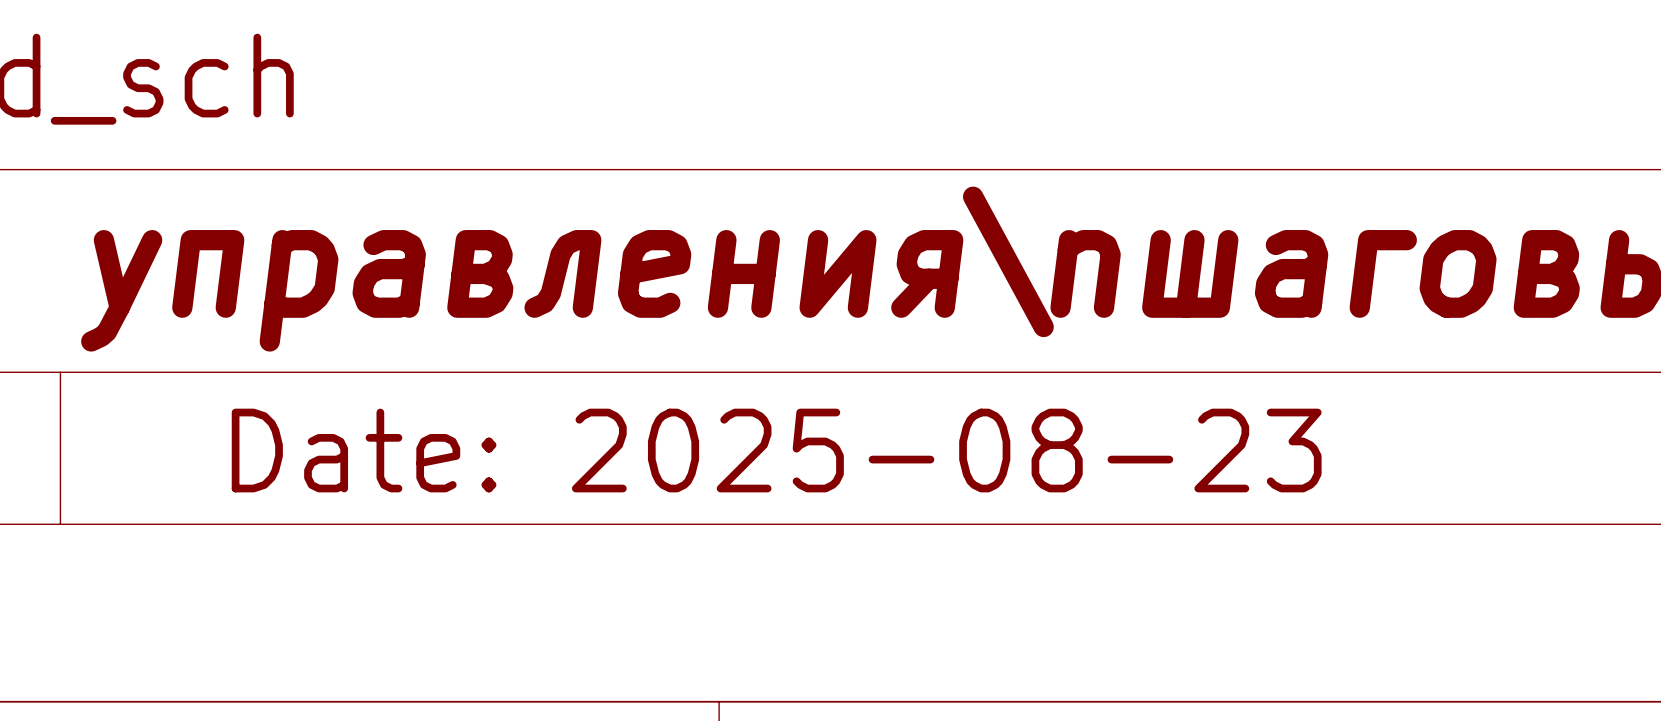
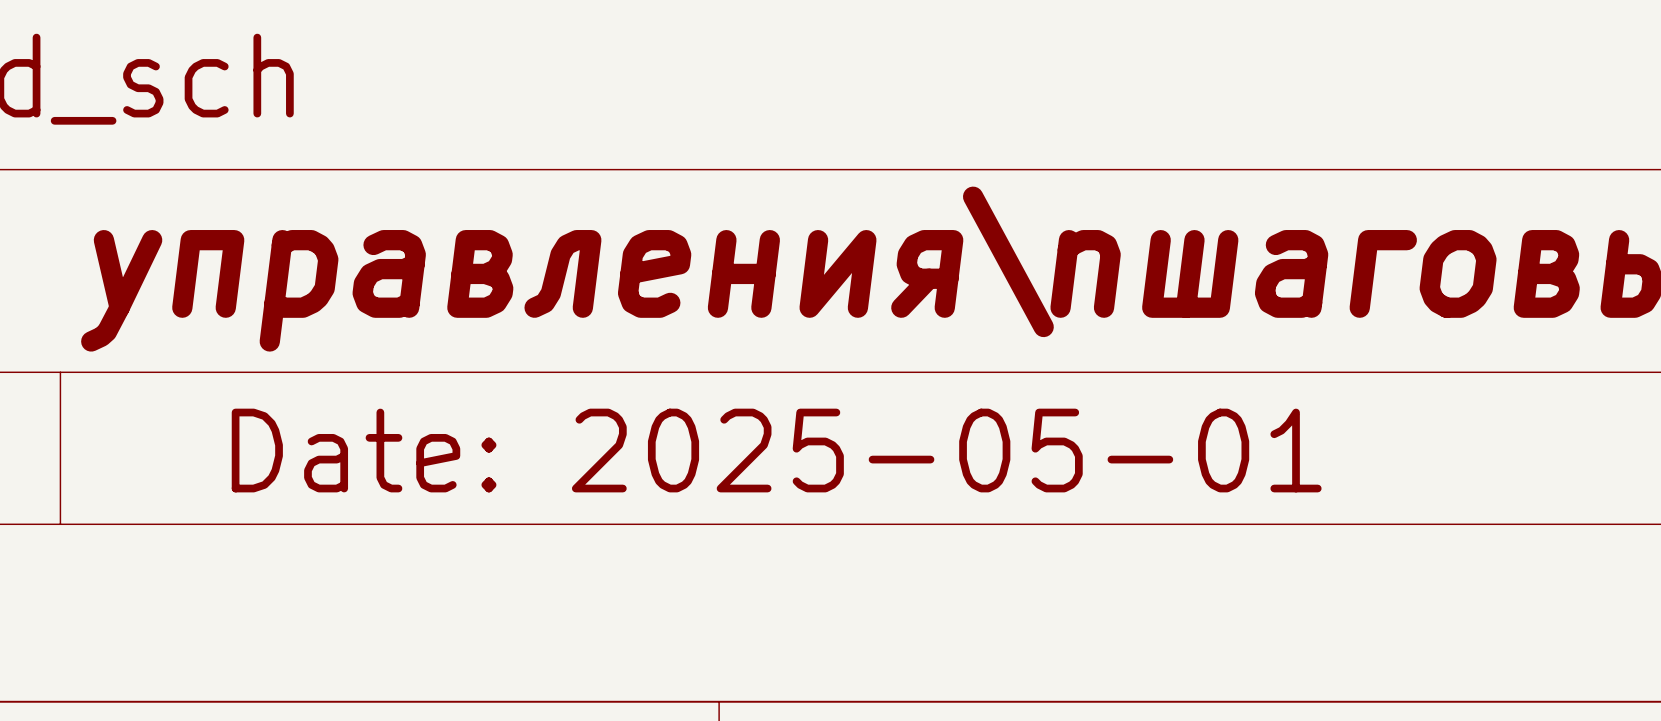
title block: Date: 2025-08-23 (776, 450) -> Date: 2025-05-01 (776, 450)

